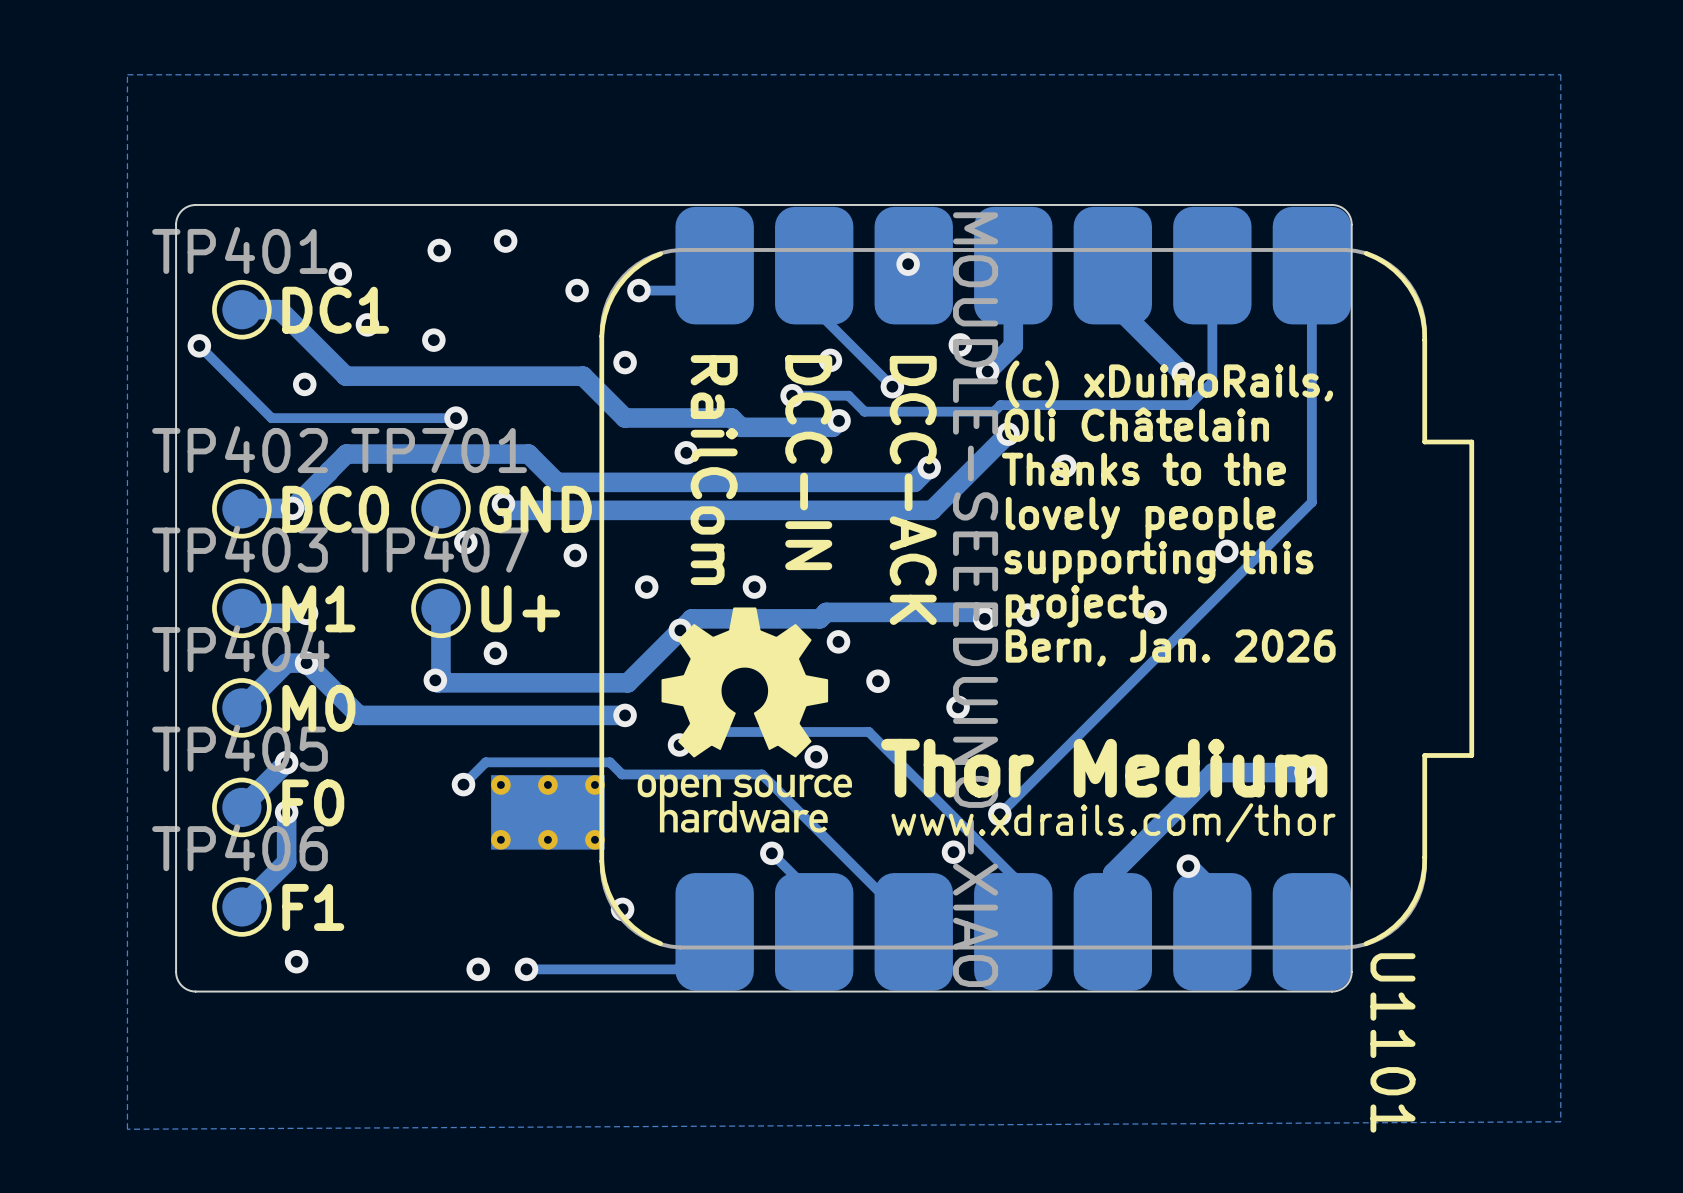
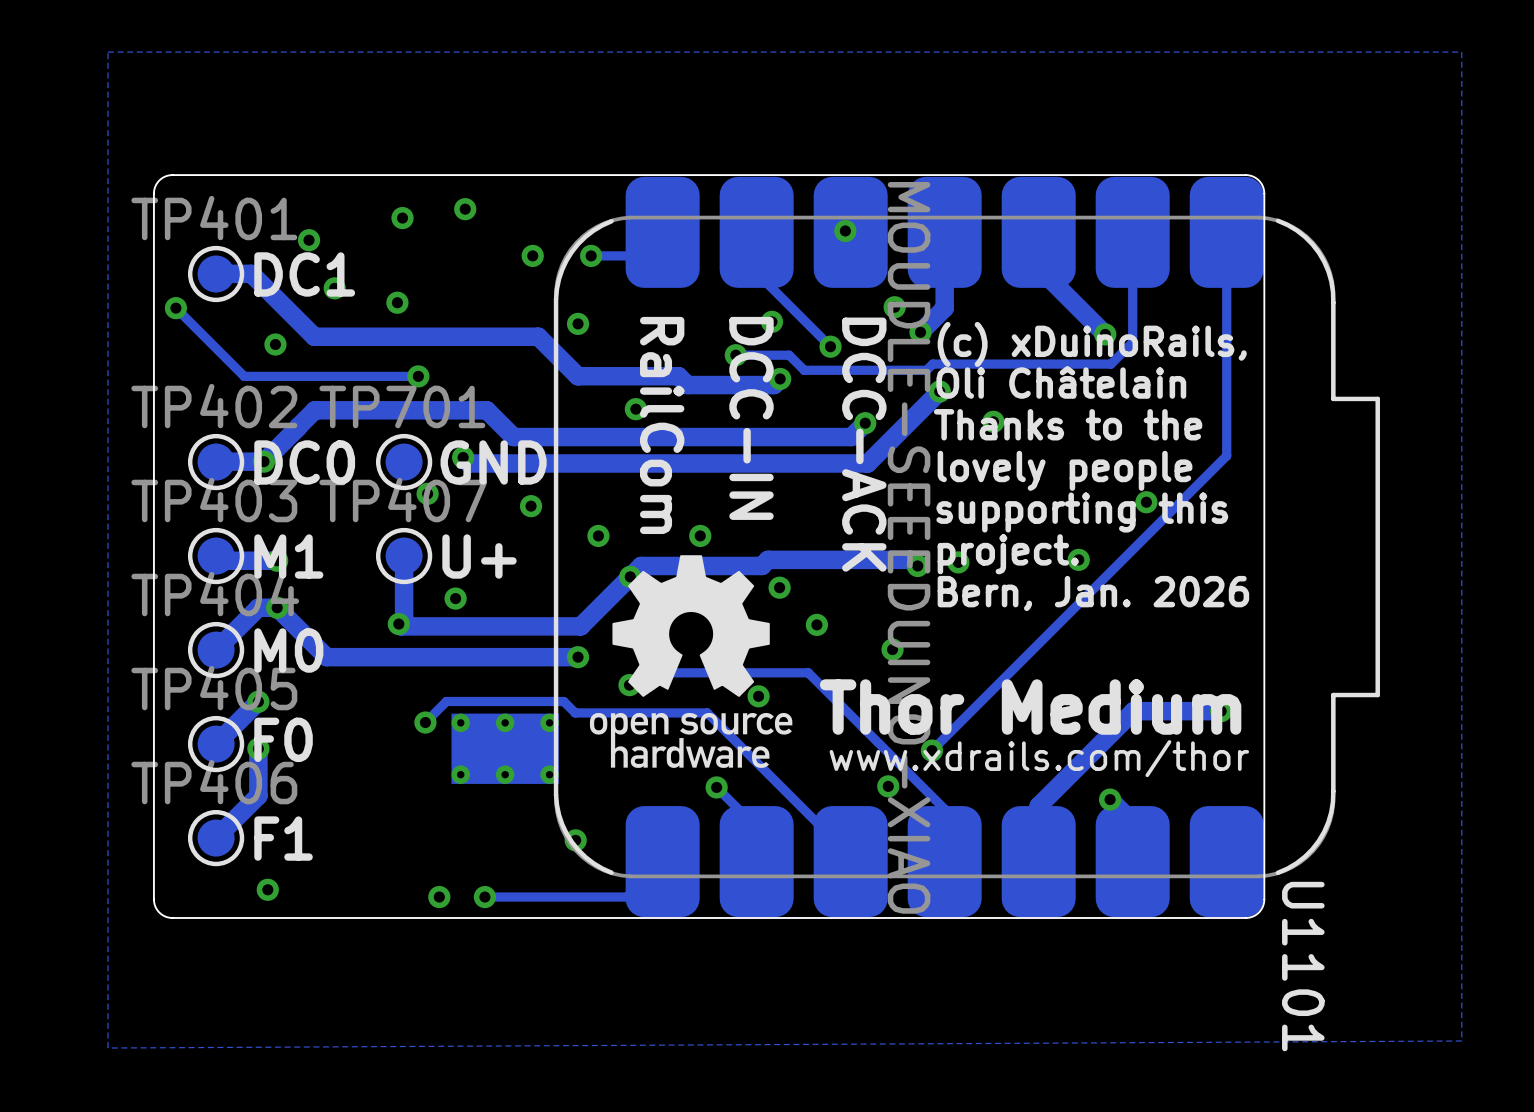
text position: DCC-ACK (913, 490) -> DCC-ACK (864, 444)

